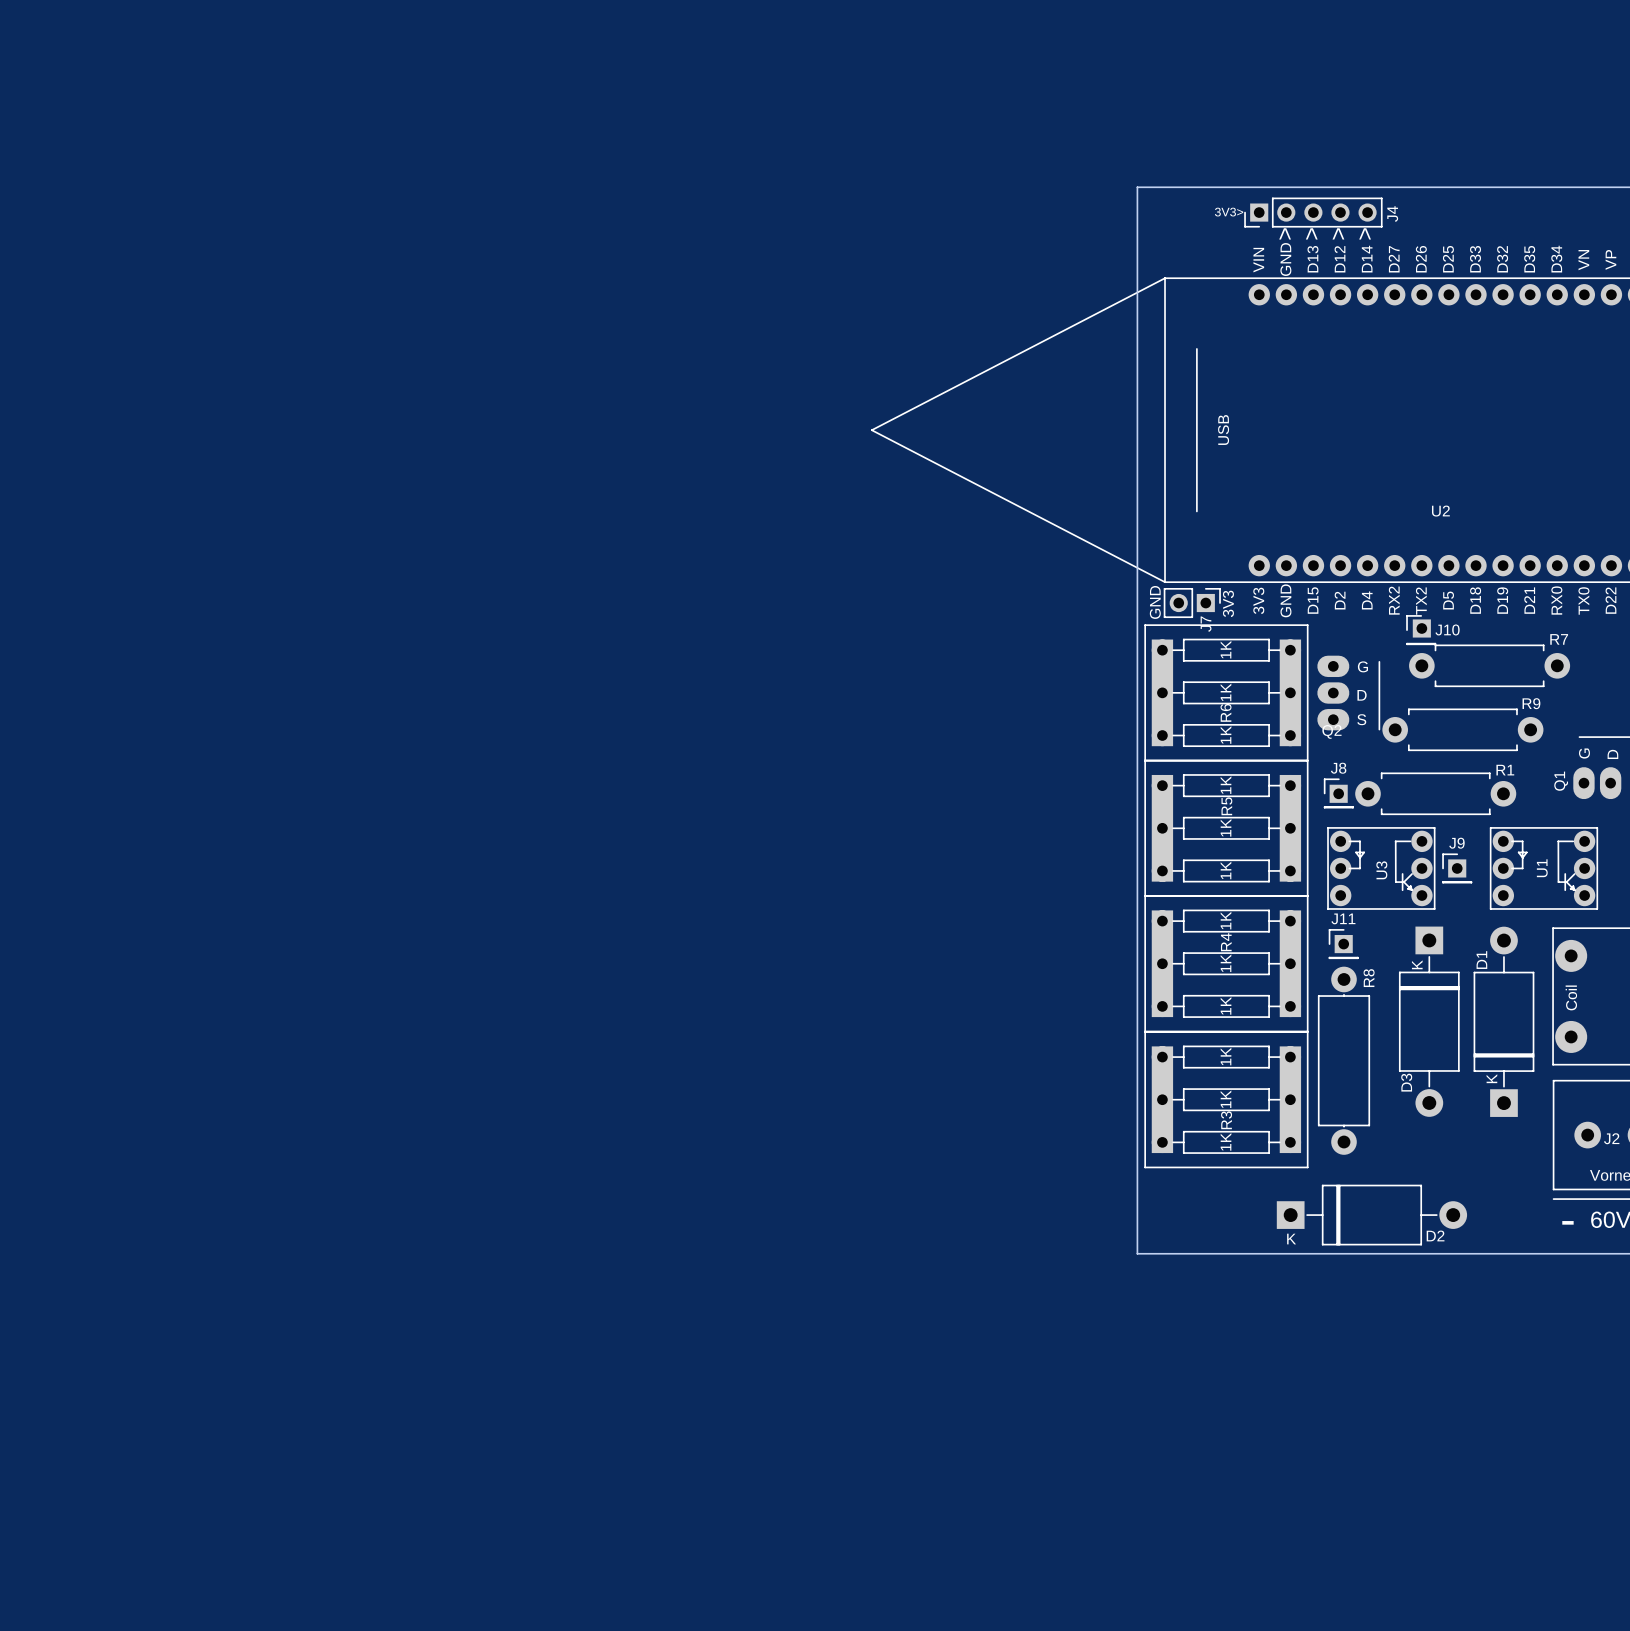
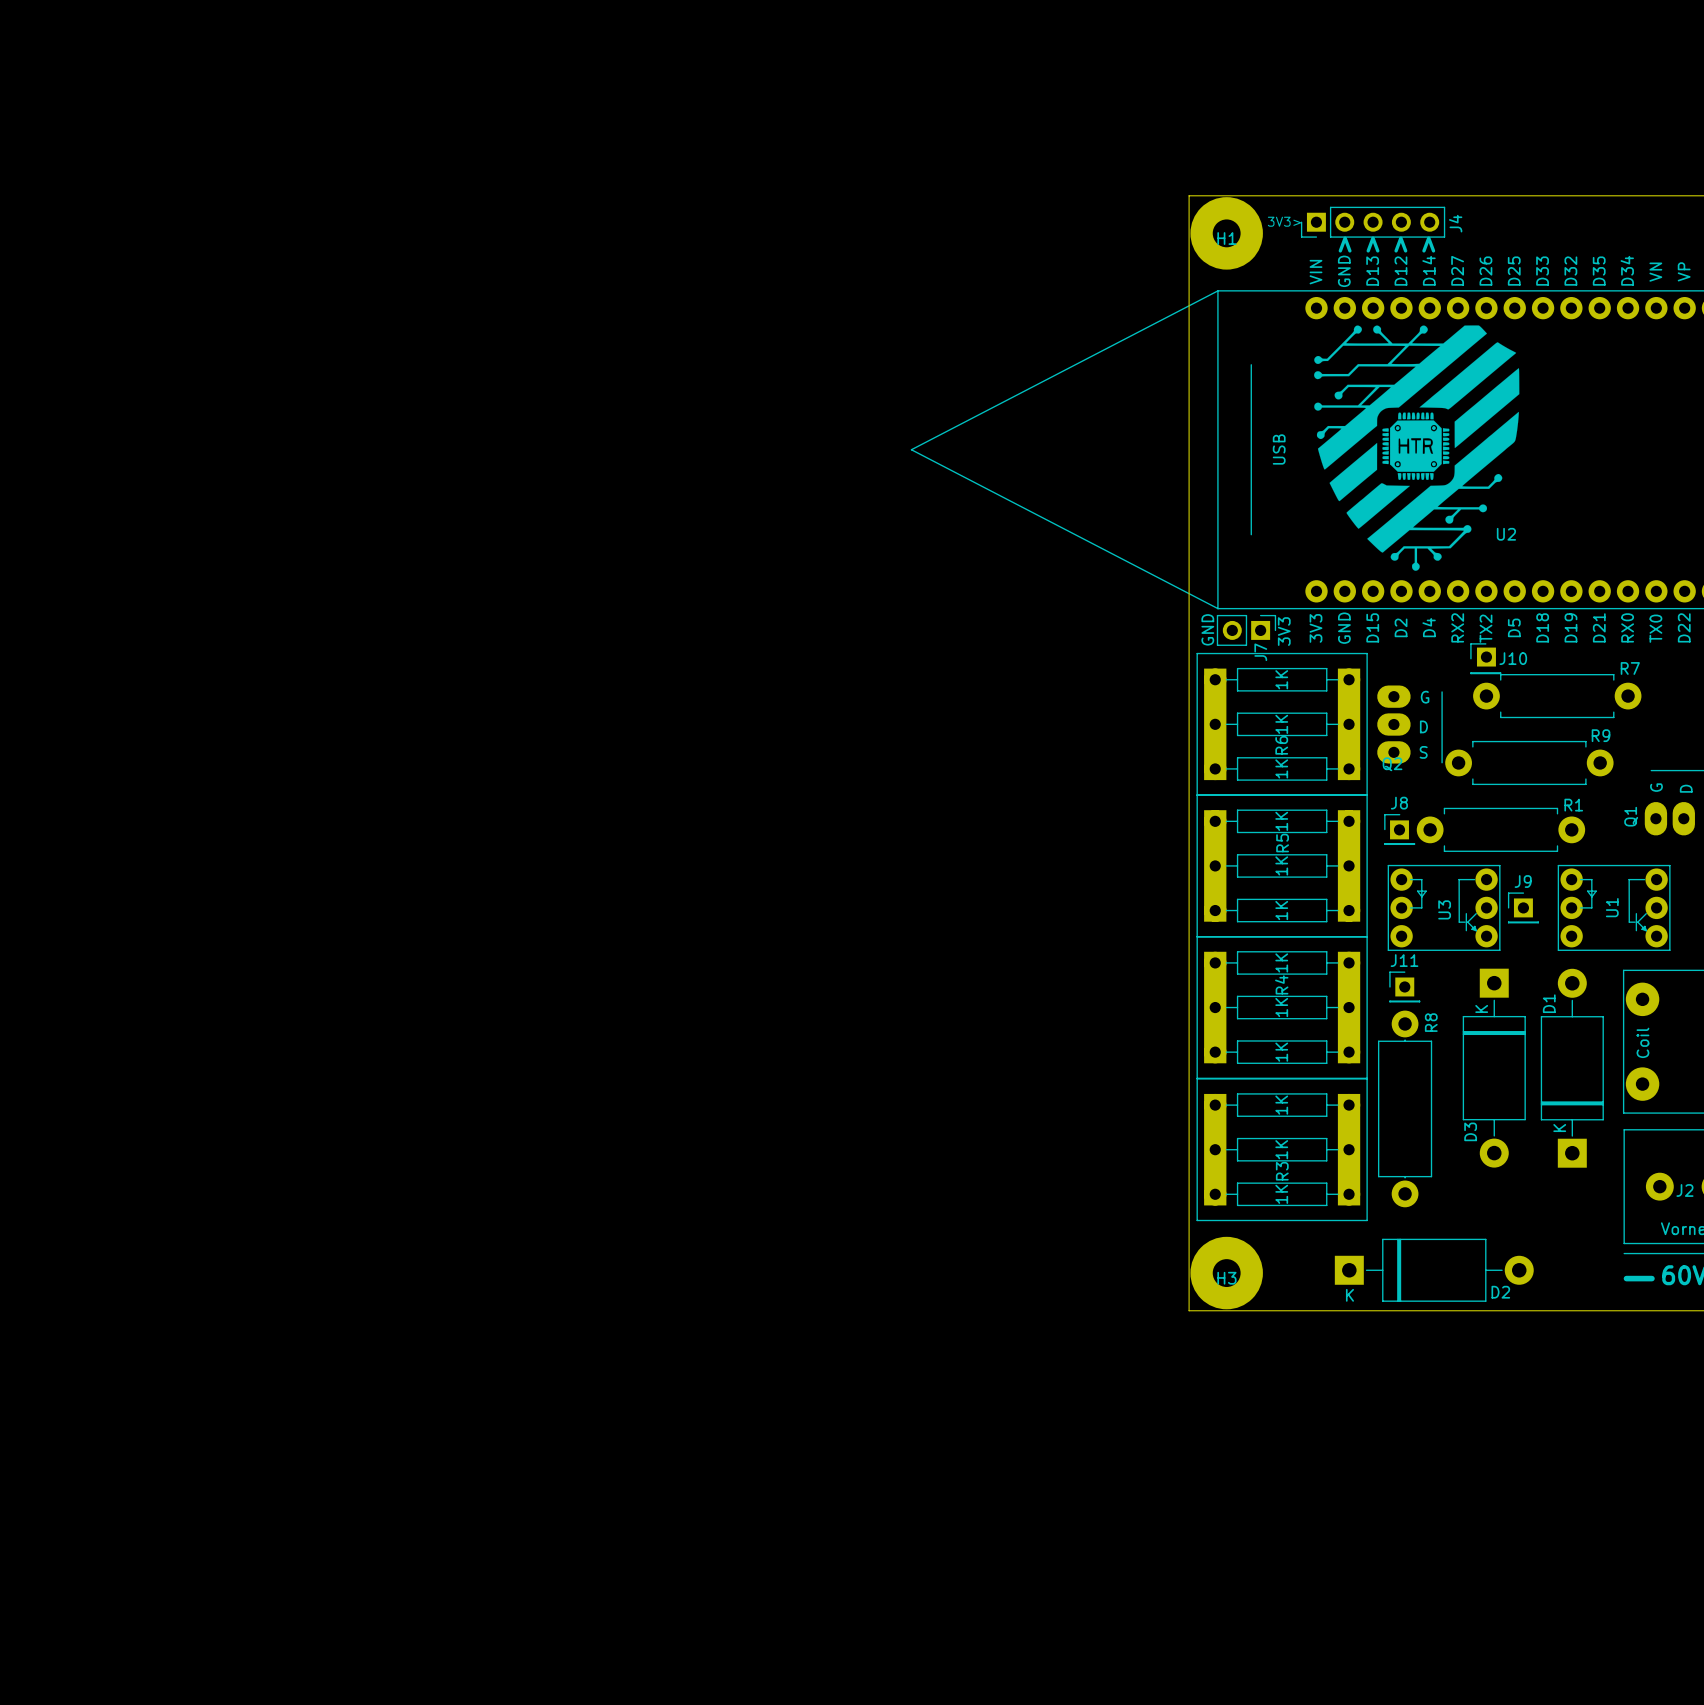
H1: none -> (1226, 233)
drawing: none -> [1314, 325, 1520, 571]
H3: none -> (1226, 1273)

